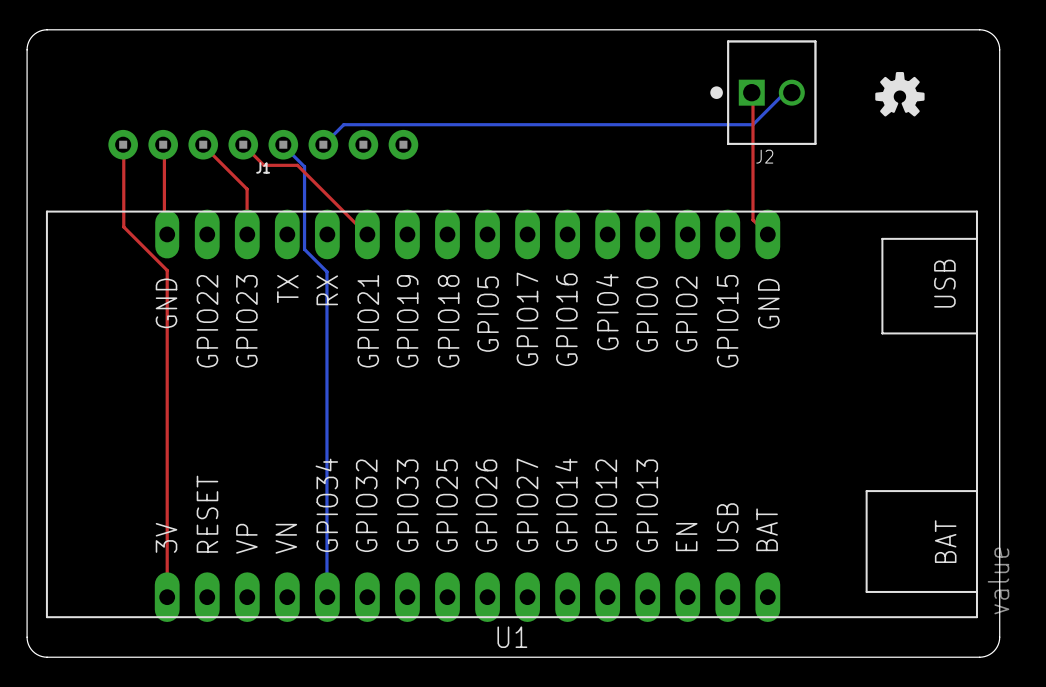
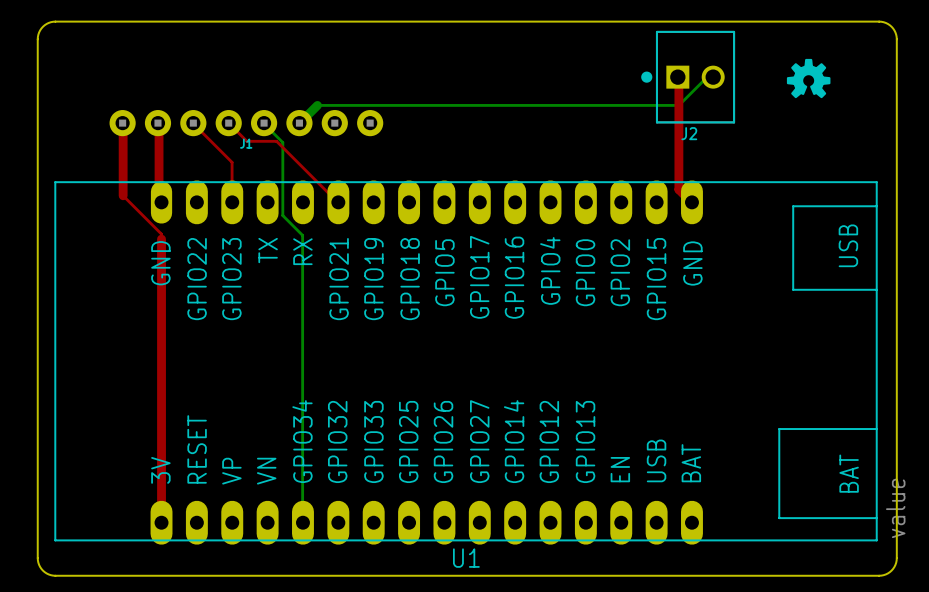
top track width: thin (751, 92) (752, 219) (767, 234) -> thick (677, 77) (678, 189) (691, 202)
bottom track width: thin (343, 124) (323, 144) -> thick (317, 105) (299, 123)
top track width: thin (123, 144) (123, 227) -> thick (122, 123) (123, 195)
top track width: thin (163, 144) (164, 231) (167, 234) -> thick (157, 123) (159, 199) (161, 202)
top track width: thin (167, 276) (167, 597) -> thick (161, 239) (161, 522)

